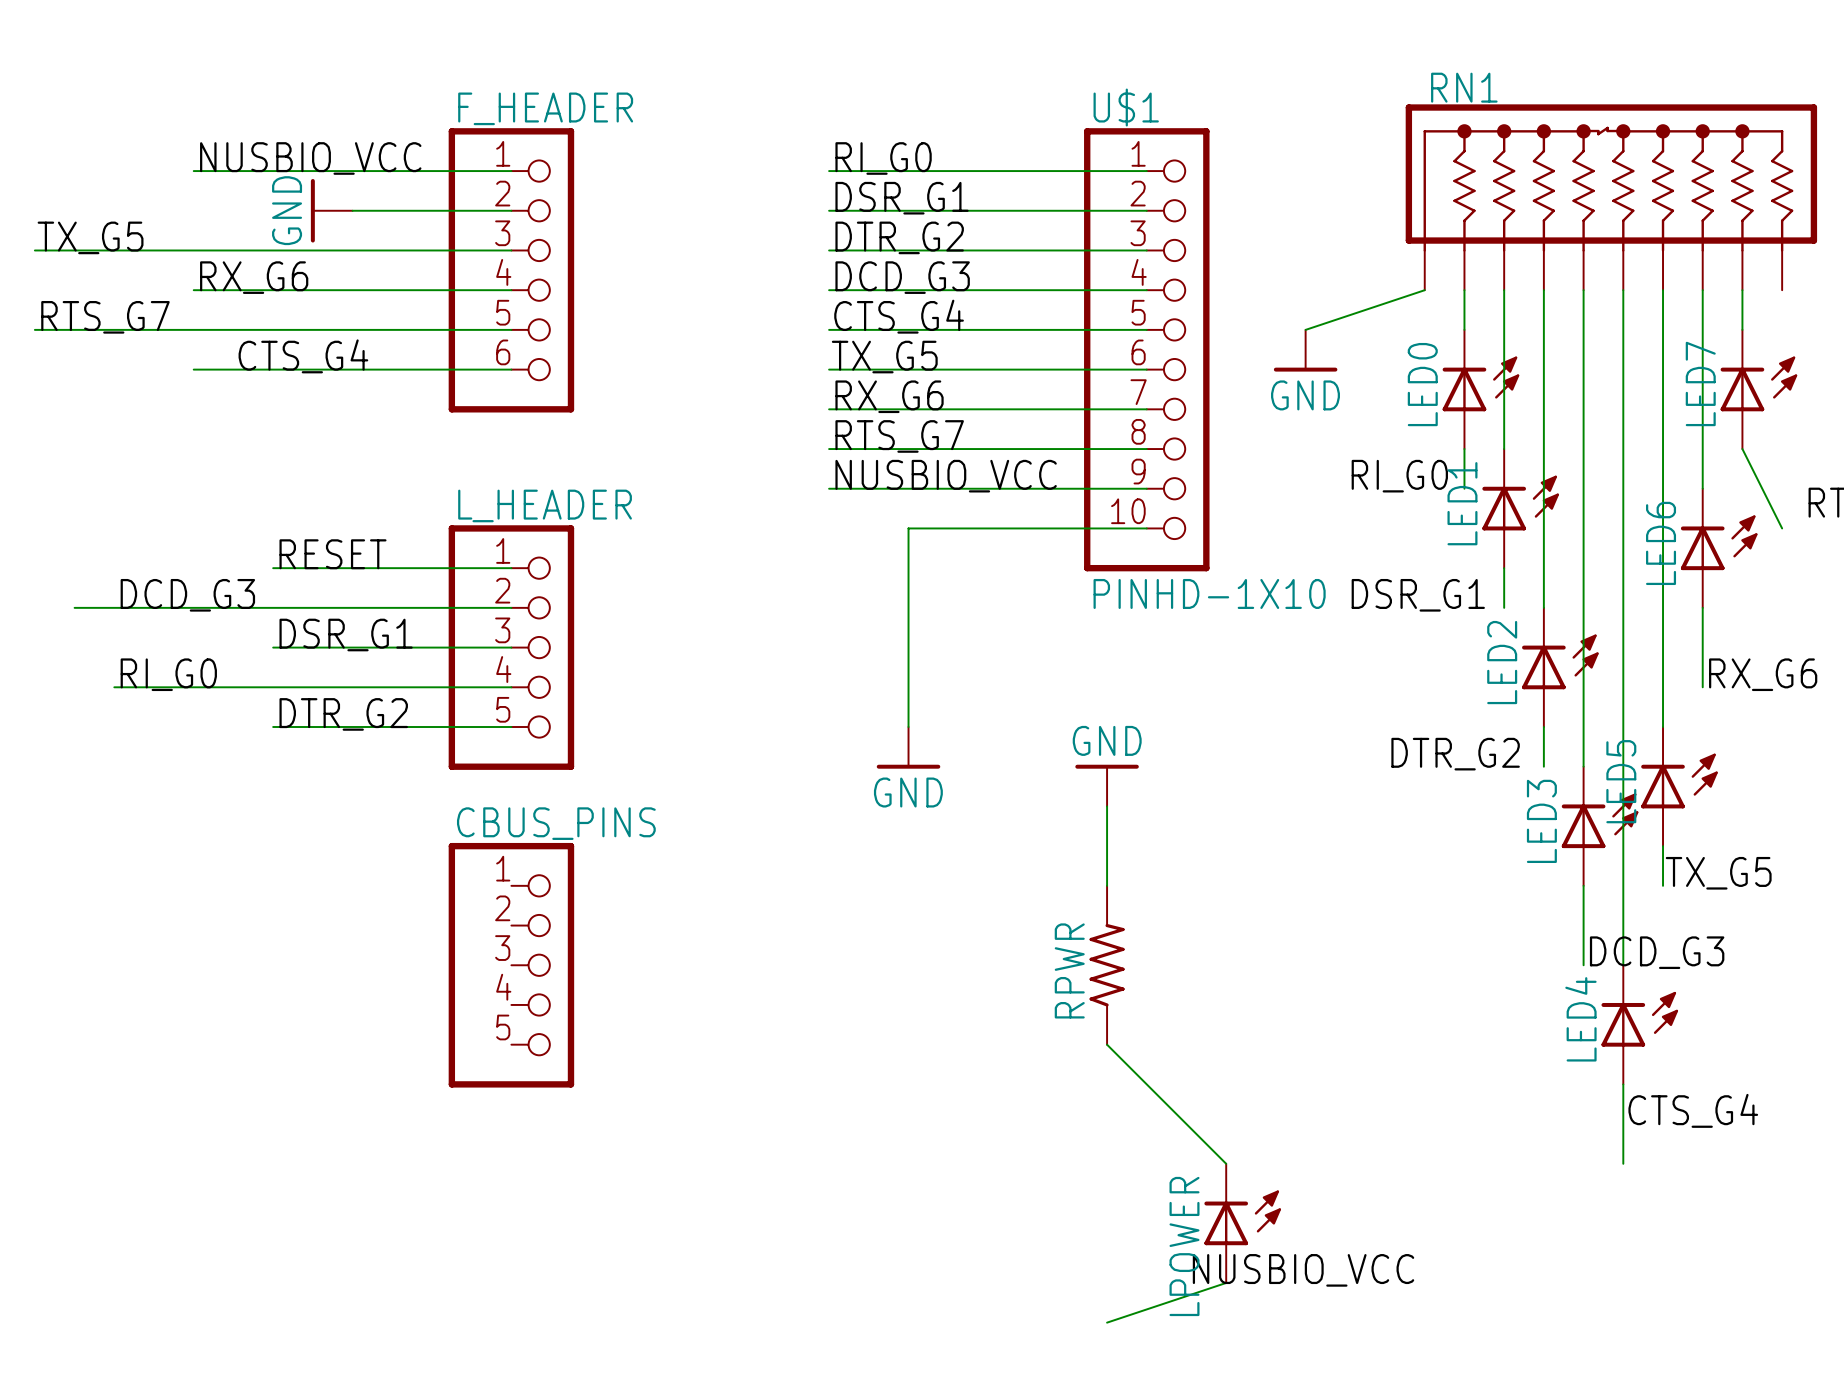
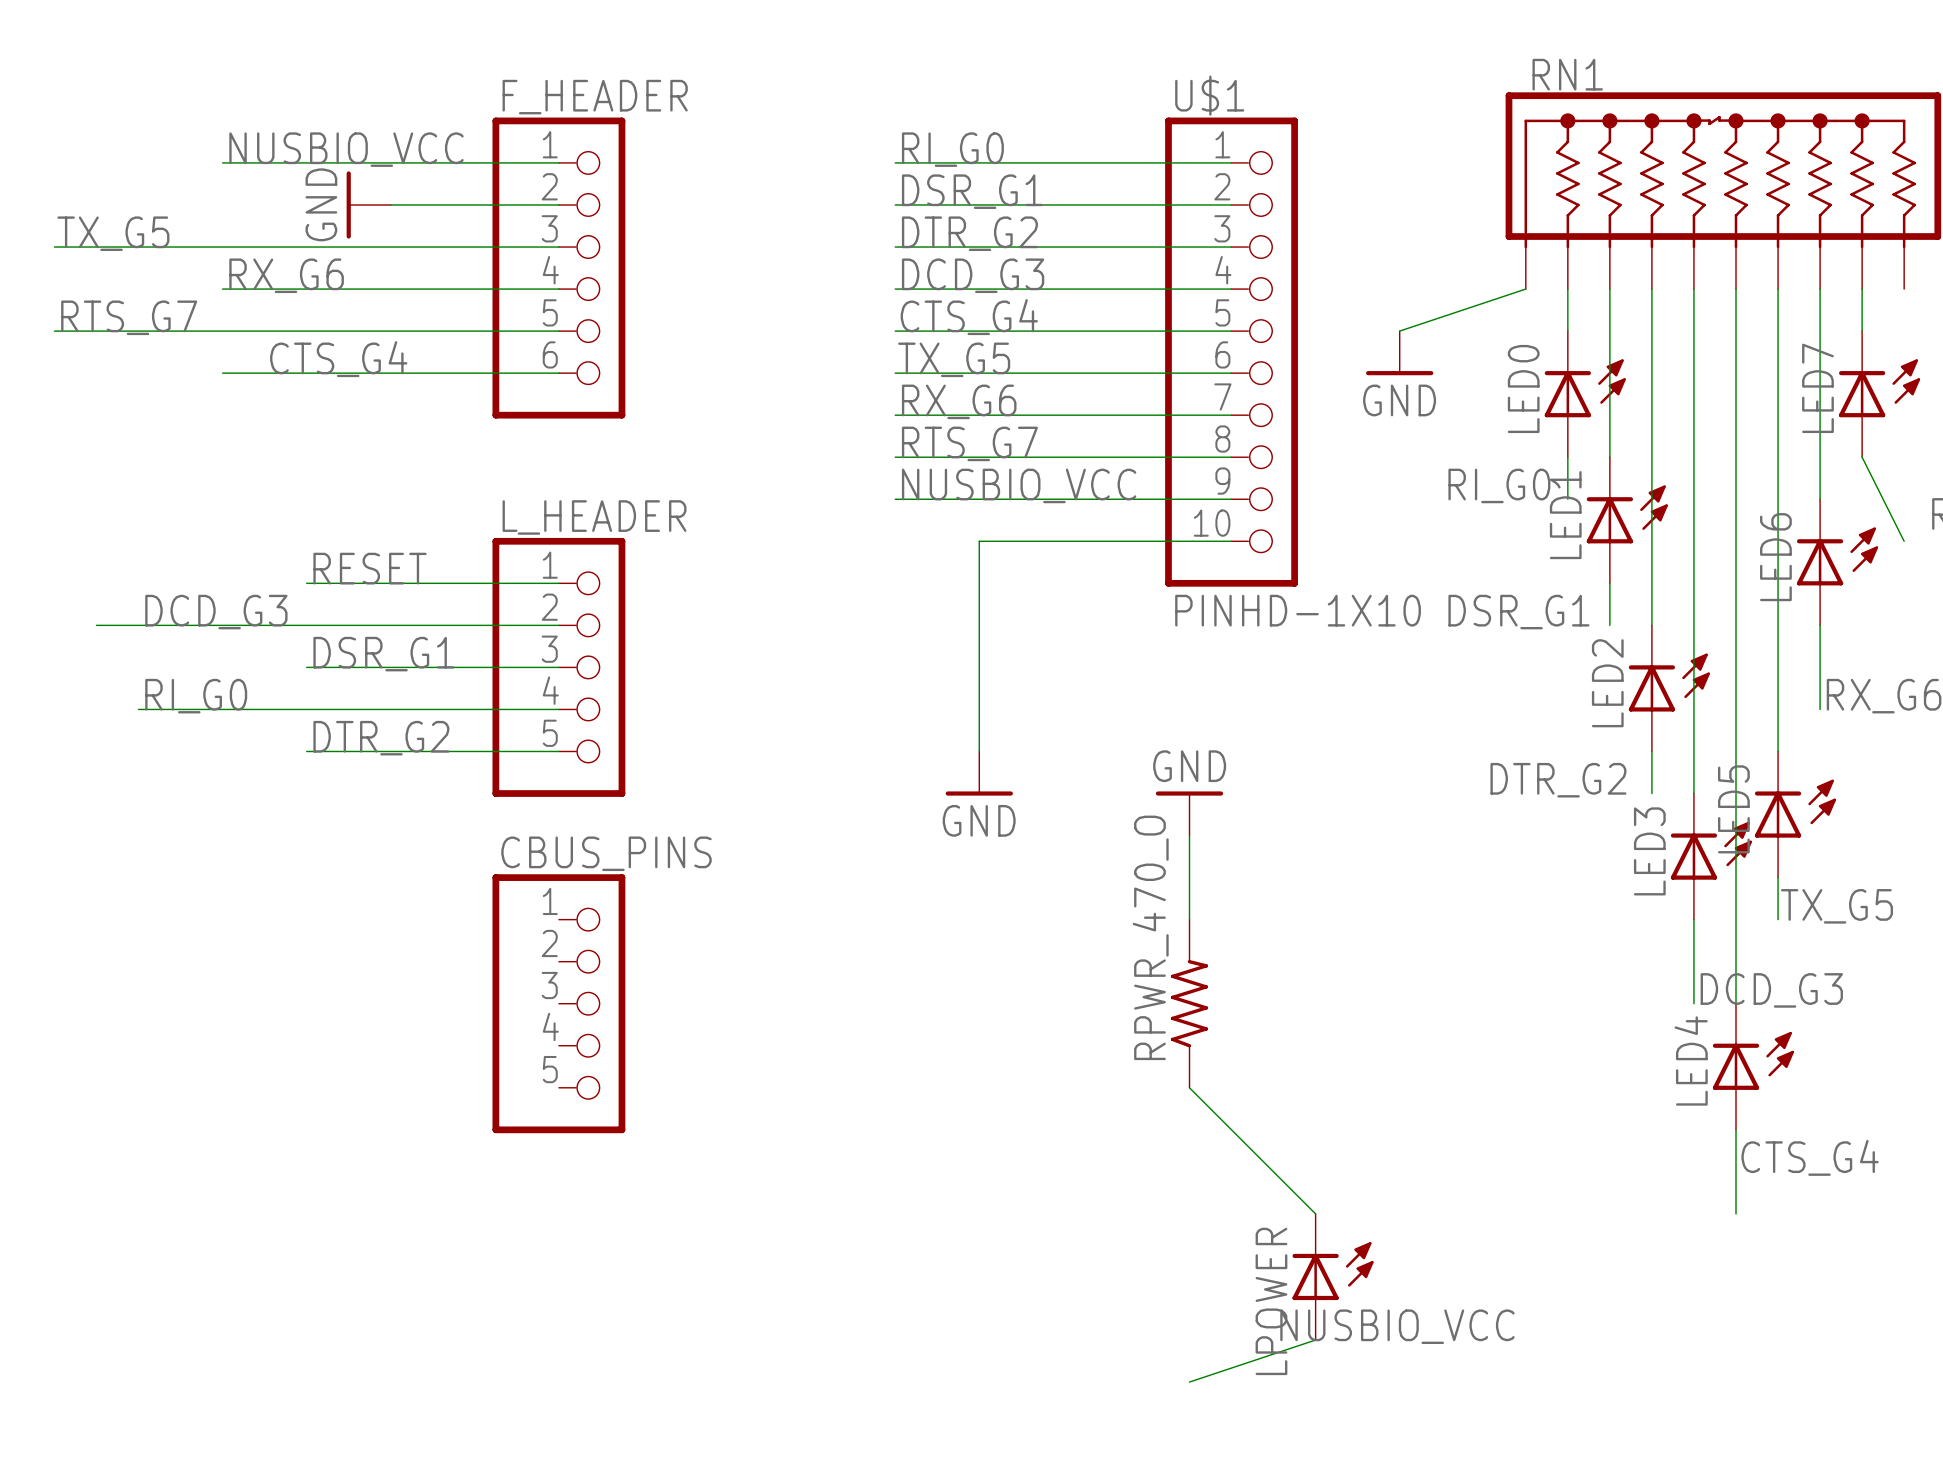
RPWR name: RPWR (1069, 970) -> RPWR_470_O (1150, 937)

